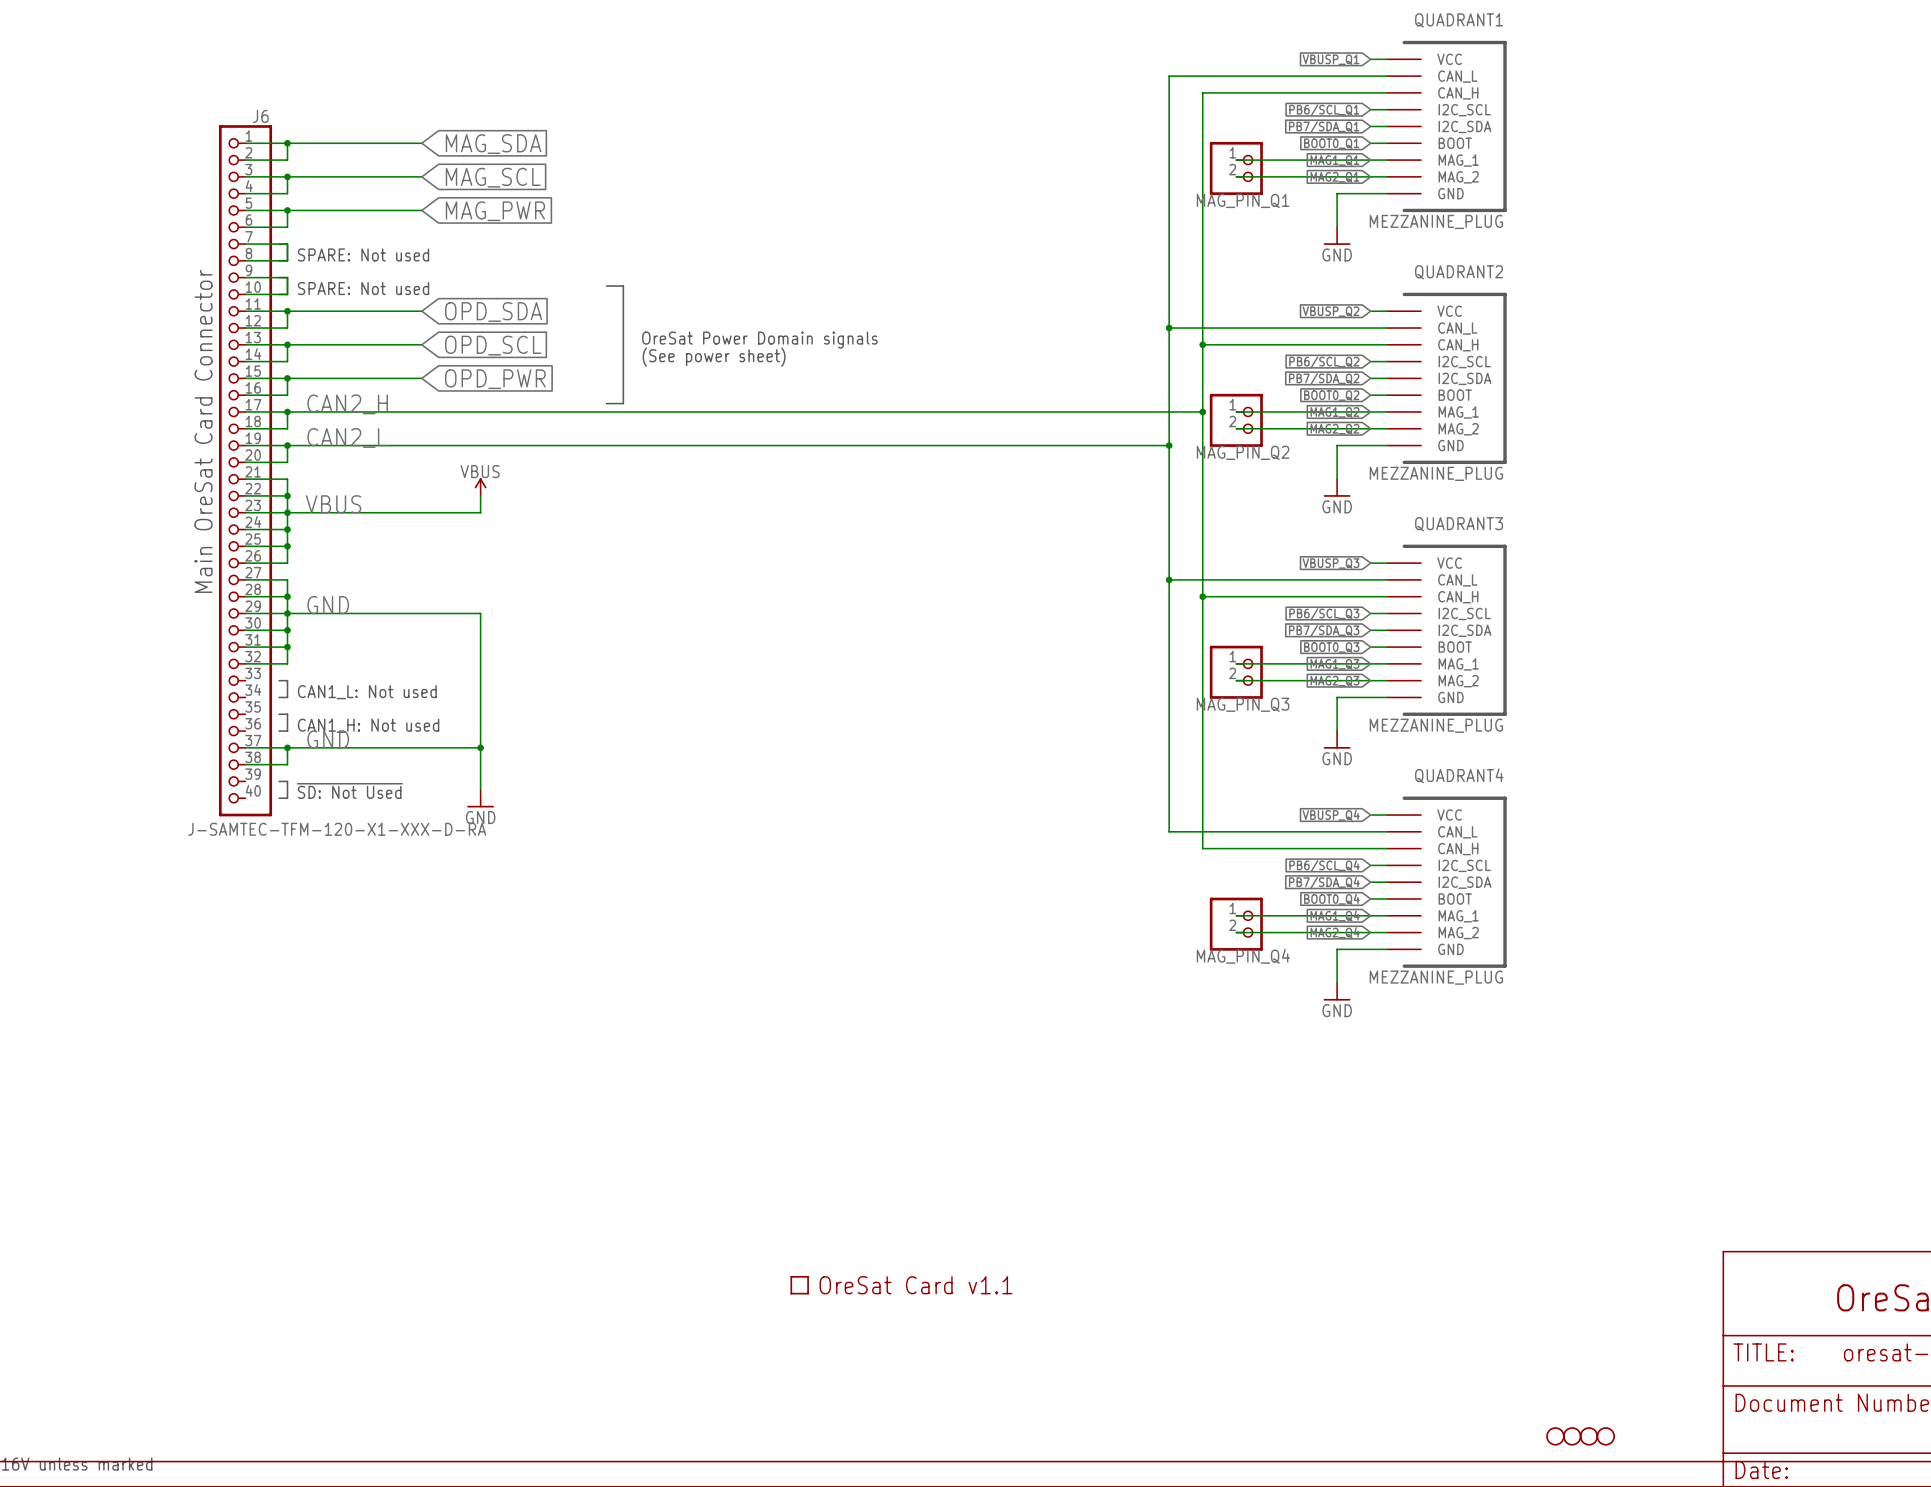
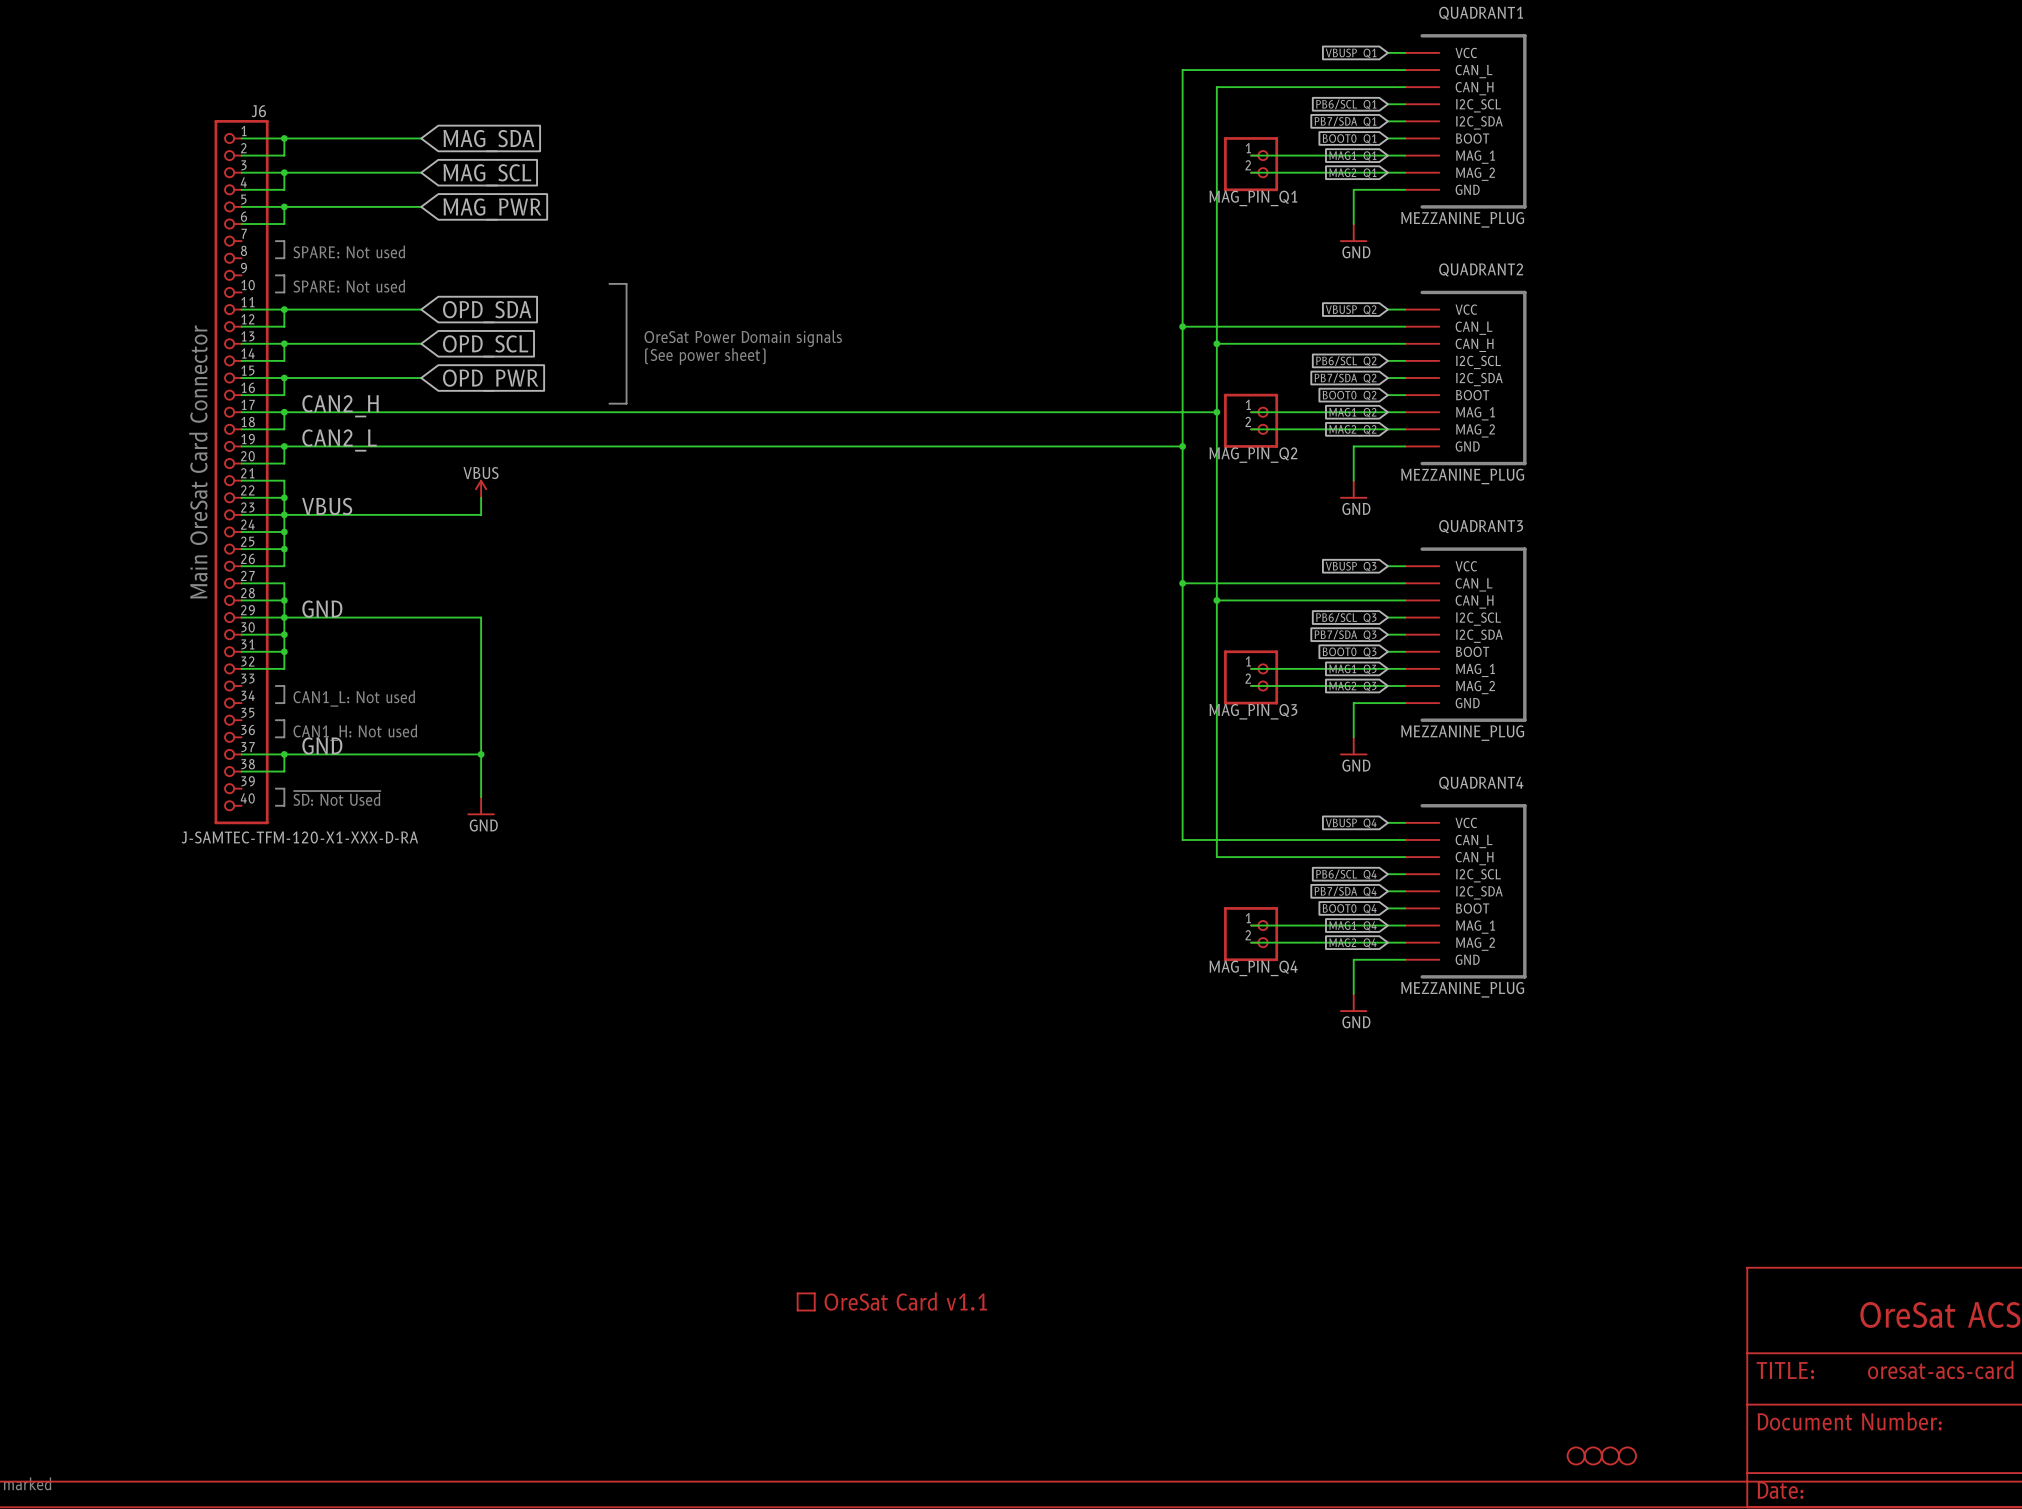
wire: (245, 244) (287, 244) (287, 260) (245, 260) -> none
wire: (245, 277) (287, 277) (287, 294) (245, 294) -> none

